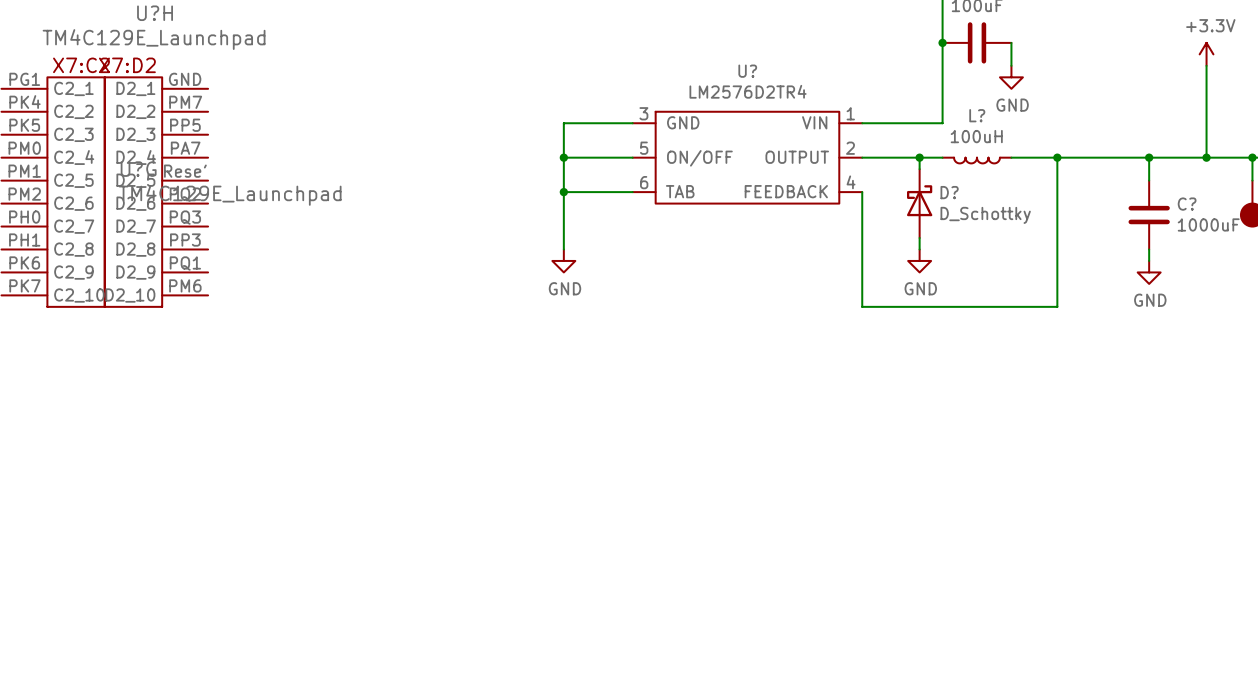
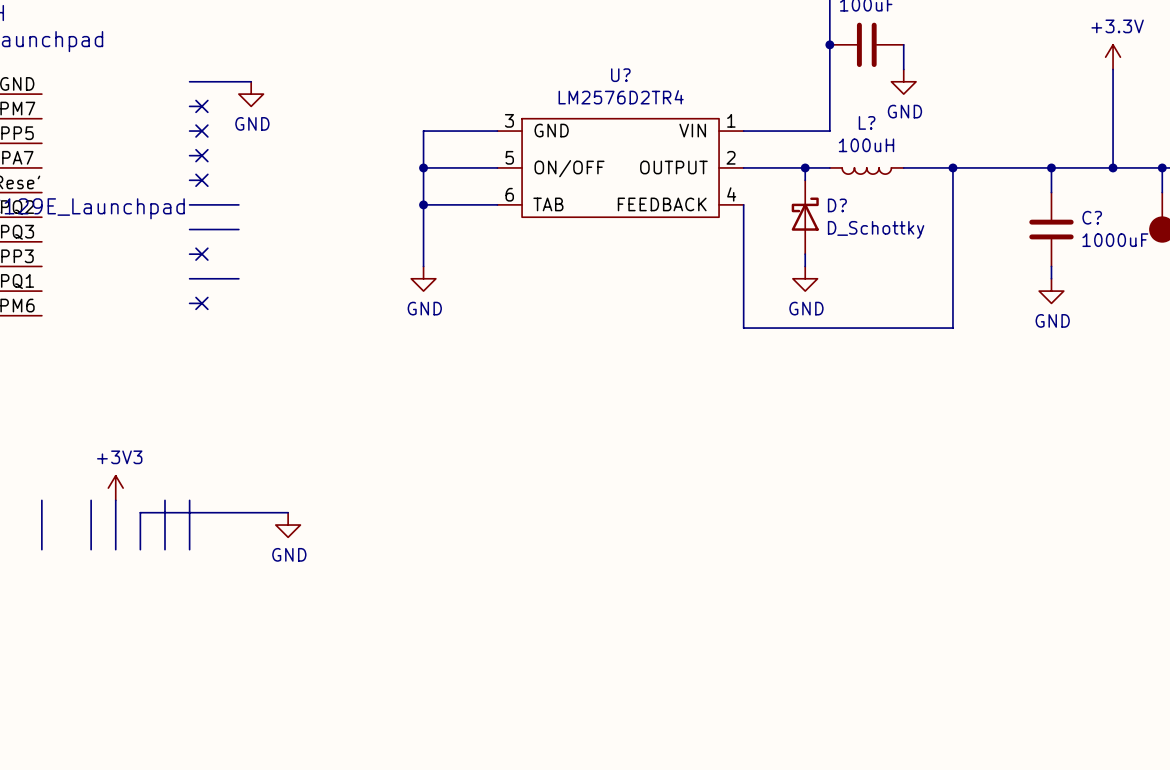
wire: none -> (189, 81) (251, 81)
power symbol: none -> GND (251, 94)
wire: none -> (189, 106) (201, 106)
no-connect mark: none -> (201, 106)
wire: none -> (189, 131) (201, 131)
no-connect mark: none -> (201, 131)
wire: none -> (189, 155) (201, 155)
no-connect mark: none -> (201, 155)
wire: none -> (189, 180) (201, 180)
no-connect mark: none -> (201, 180)
wire: none -> (189, 204) (238, 204)
wire: none -> (189, 229) (238, 229)
wire: none -> (189, 254) (201, 254)
no-connect mark: none -> (201, 254)
wire: none -> (189, 278) (238, 278)
wire: none -> (189, 303) (201, 303)
no-connect mark: none -> (201, 303)
power symbol: none -> +3V3 (115, 488)
wire: none -> (41, 500) (41, 549)
wire: none -> (91, 500) (91, 549)
wire: none -> (115, 500) (115, 549)
wire: none -> (164, 500) (164, 549)
wire: none -> (189, 500) (189, 549)
wire: none -> (288, 512) (140, 512) (140, 549)
power symbol: none -> GND (288, 525)

